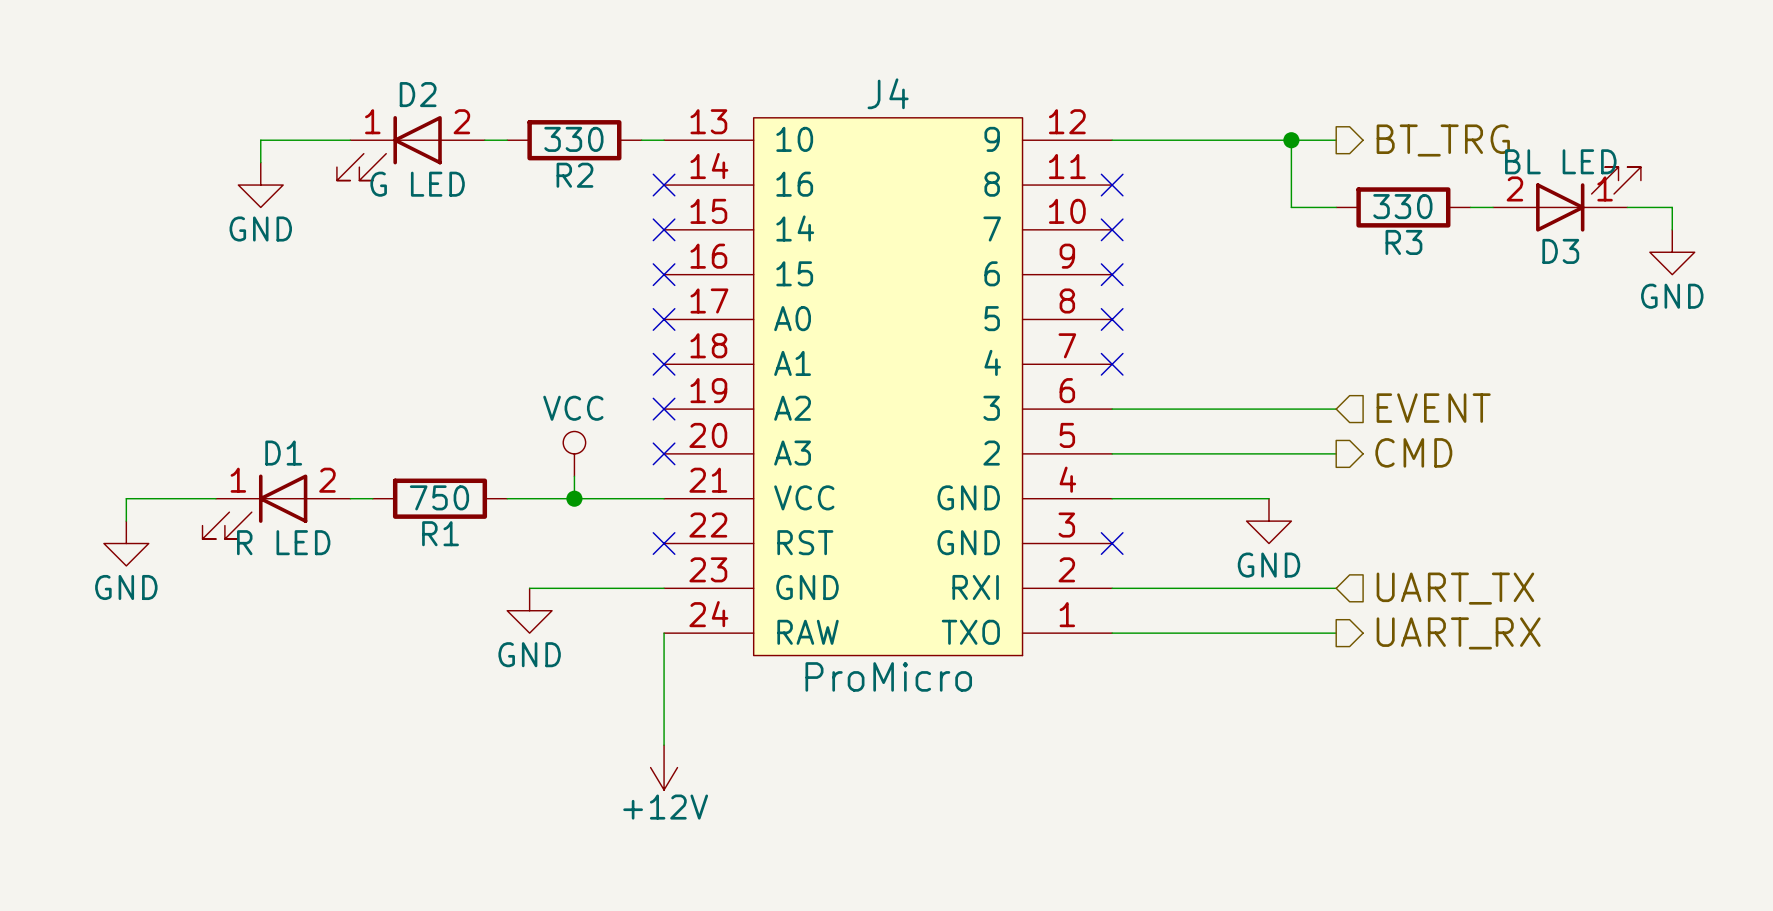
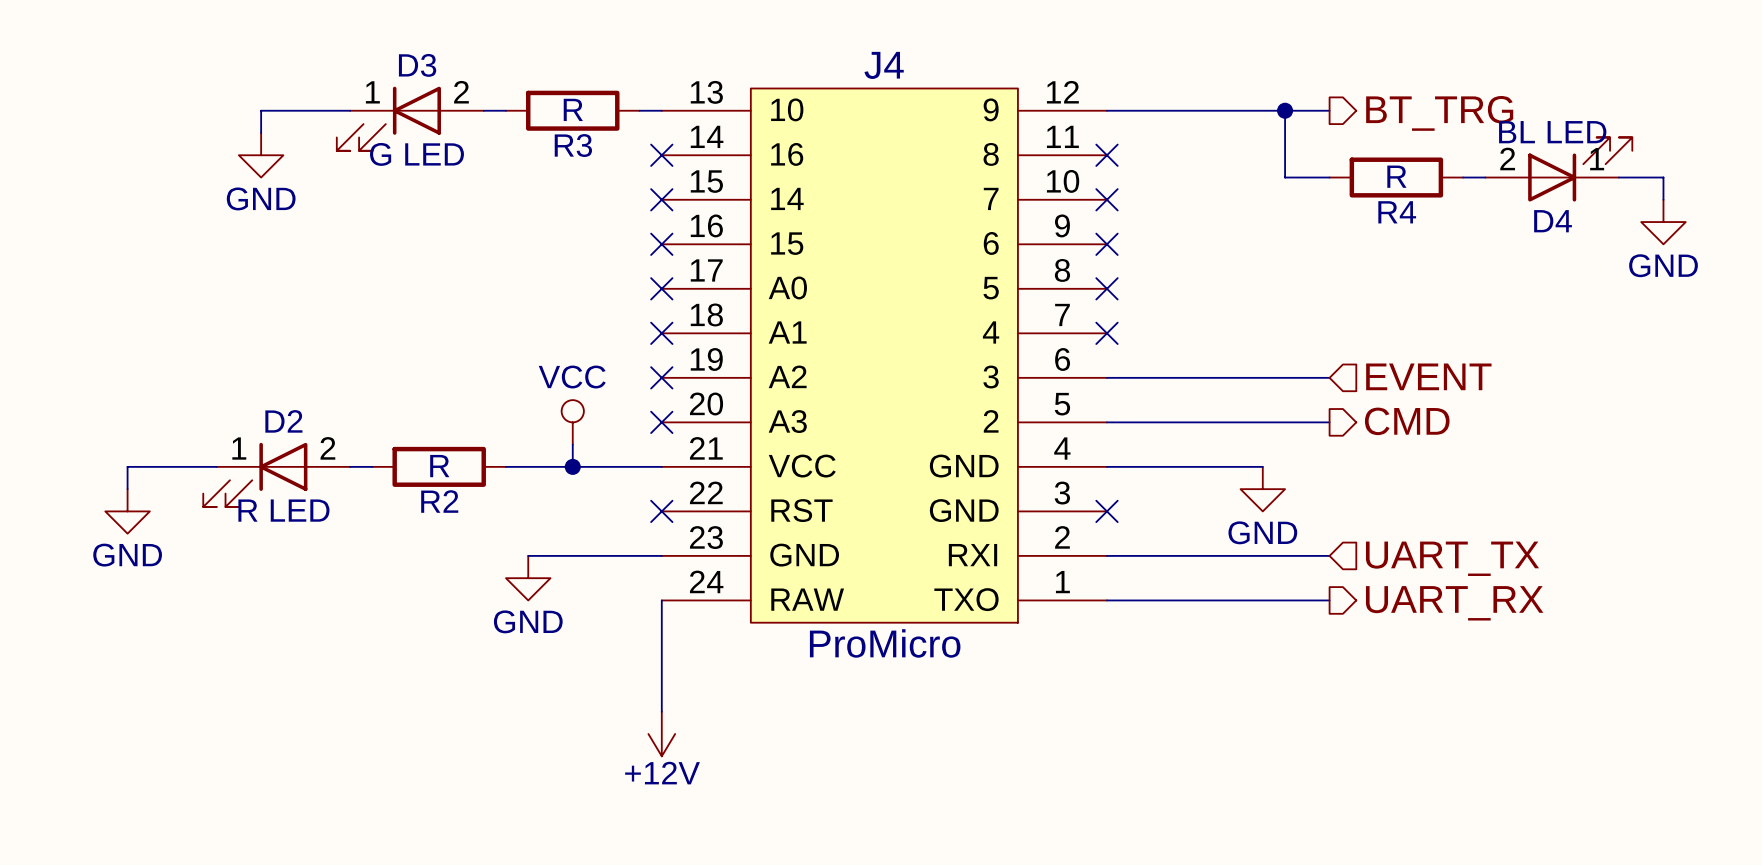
D2 name: D2 (418, 94) -> D3 (417, 65)
R2 value: 330 (573, 139) -> R (573, 109)
R2 name: R2 (574, 175) -> R3 (573, 145)
R3 value: 330 (1402, 206) -> R (1396, 176)
R3 name: R3 (1403, 242) -> R4 (1397, 212)
D3 name: D3 (1560, 251) -> D4 (1553, 221)
D1 name: D1 (283, 453) -> D2 (283, 421)
R1 value: 750 (439, 497) -> R (439, 466)
R1 name: R1 (440, 533) -> R2 (439, 501)

